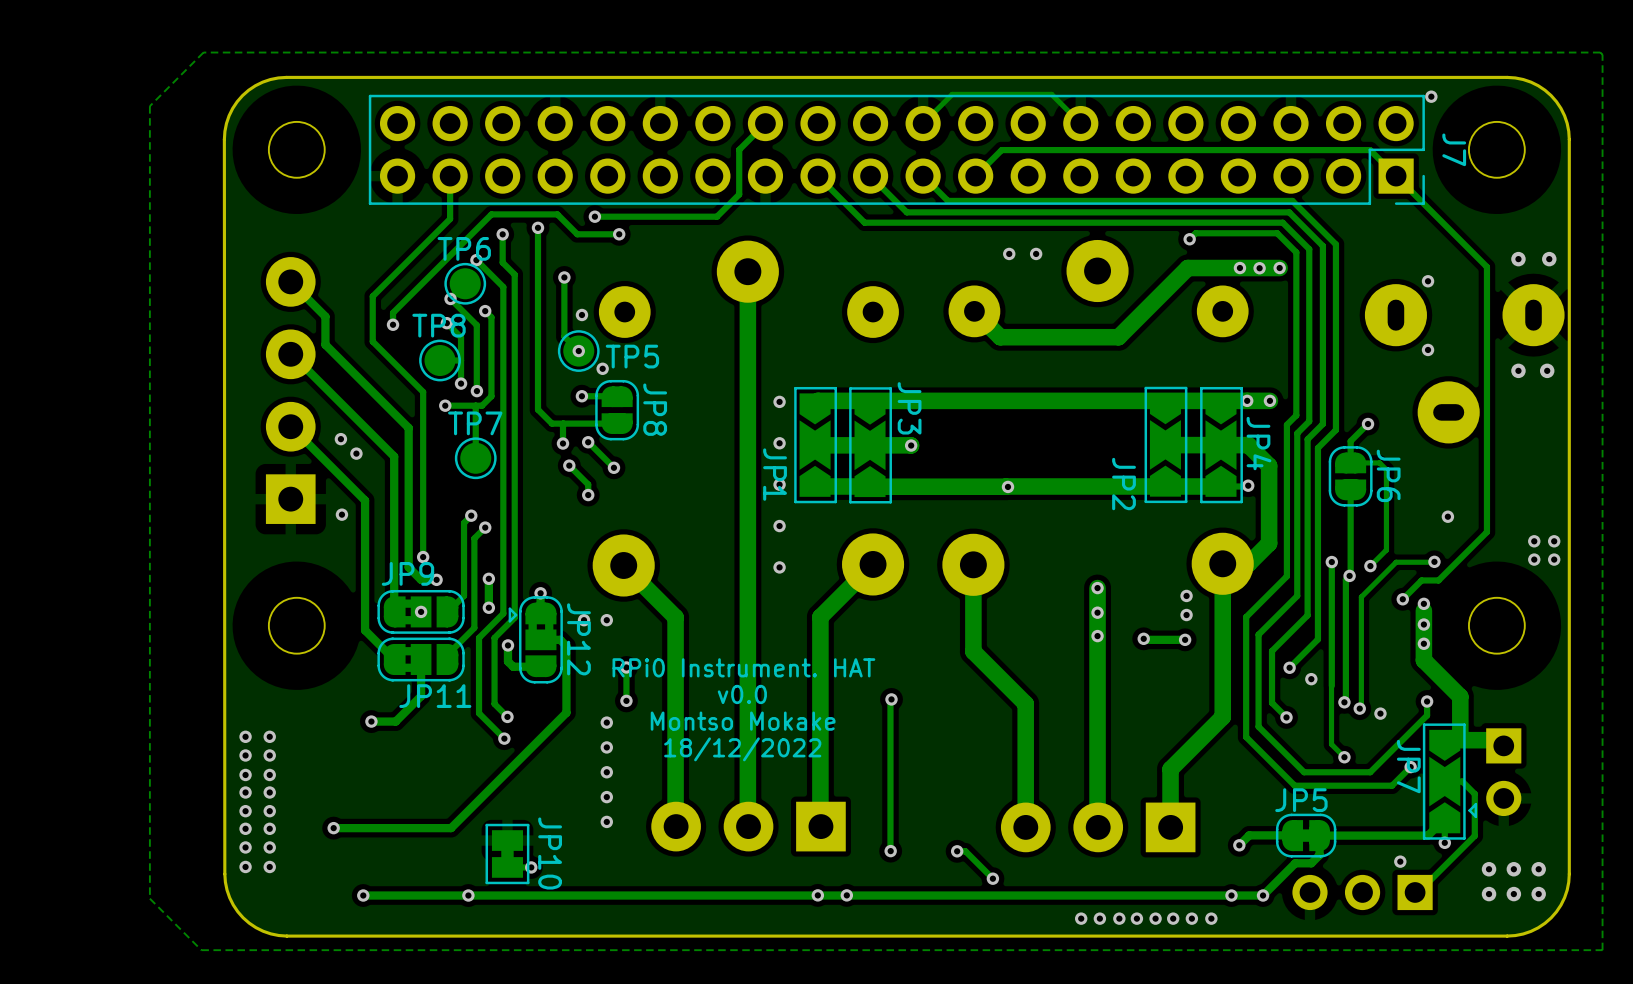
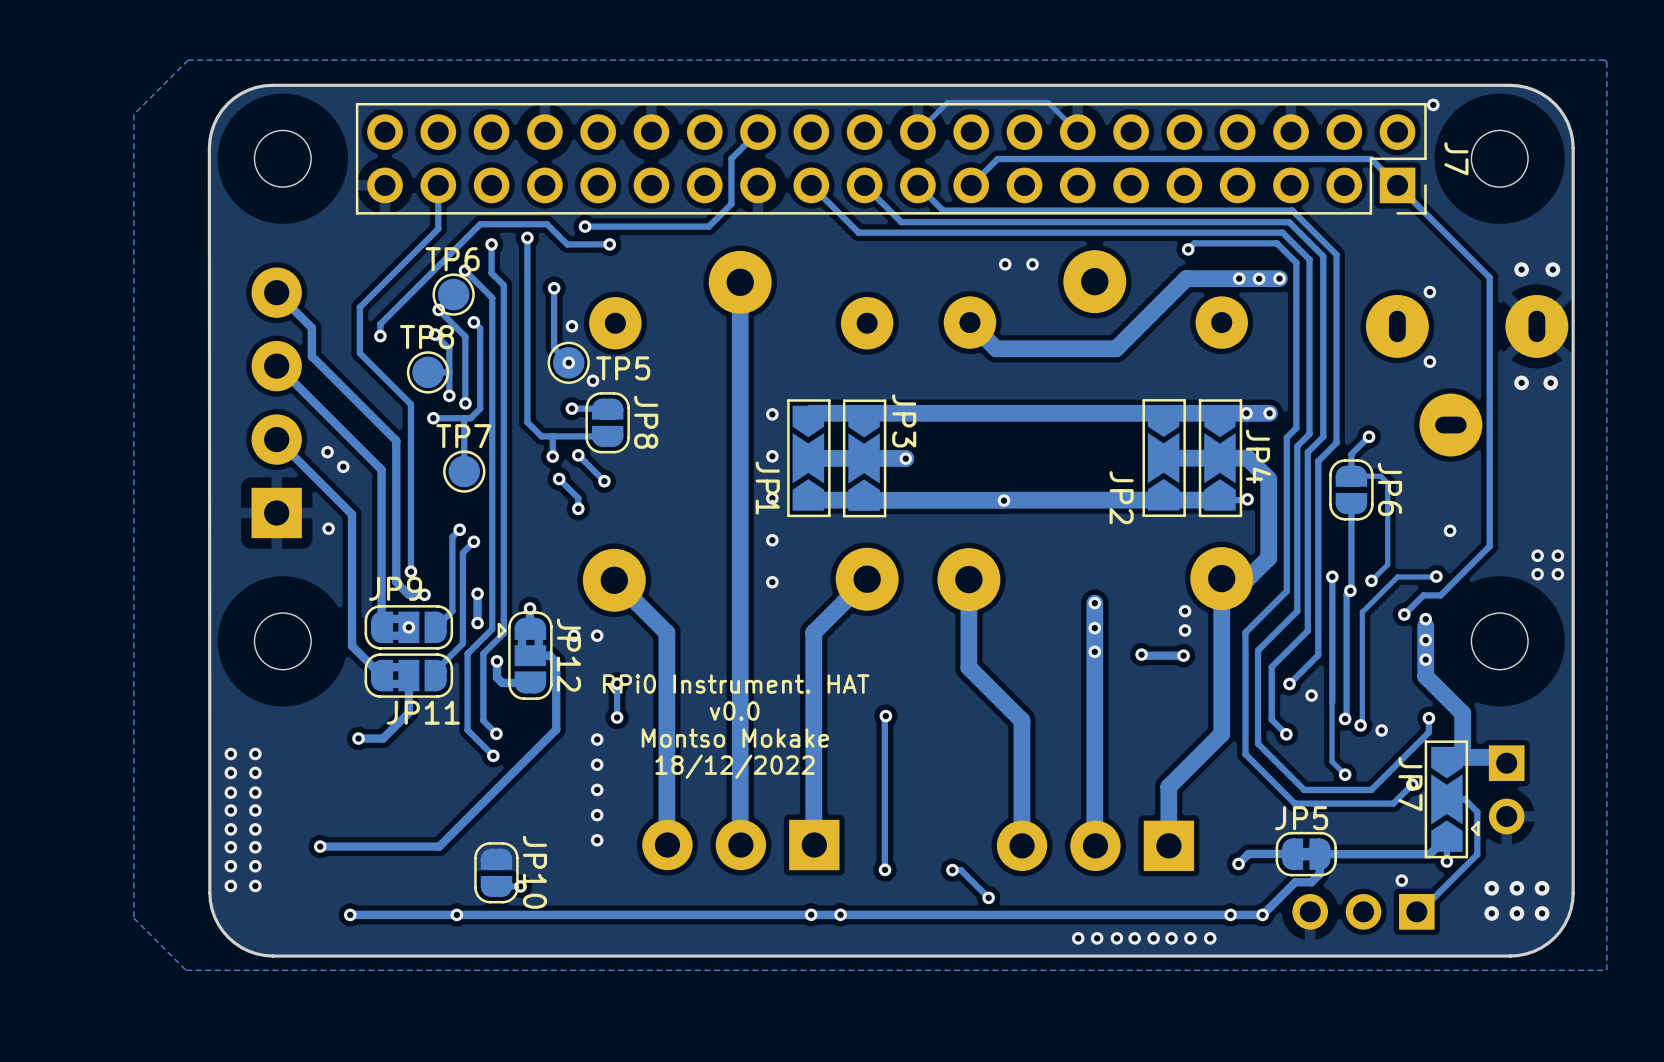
JP10 footprint: [485, 823, 530, 885] -> [474, 842, 519, 904]

